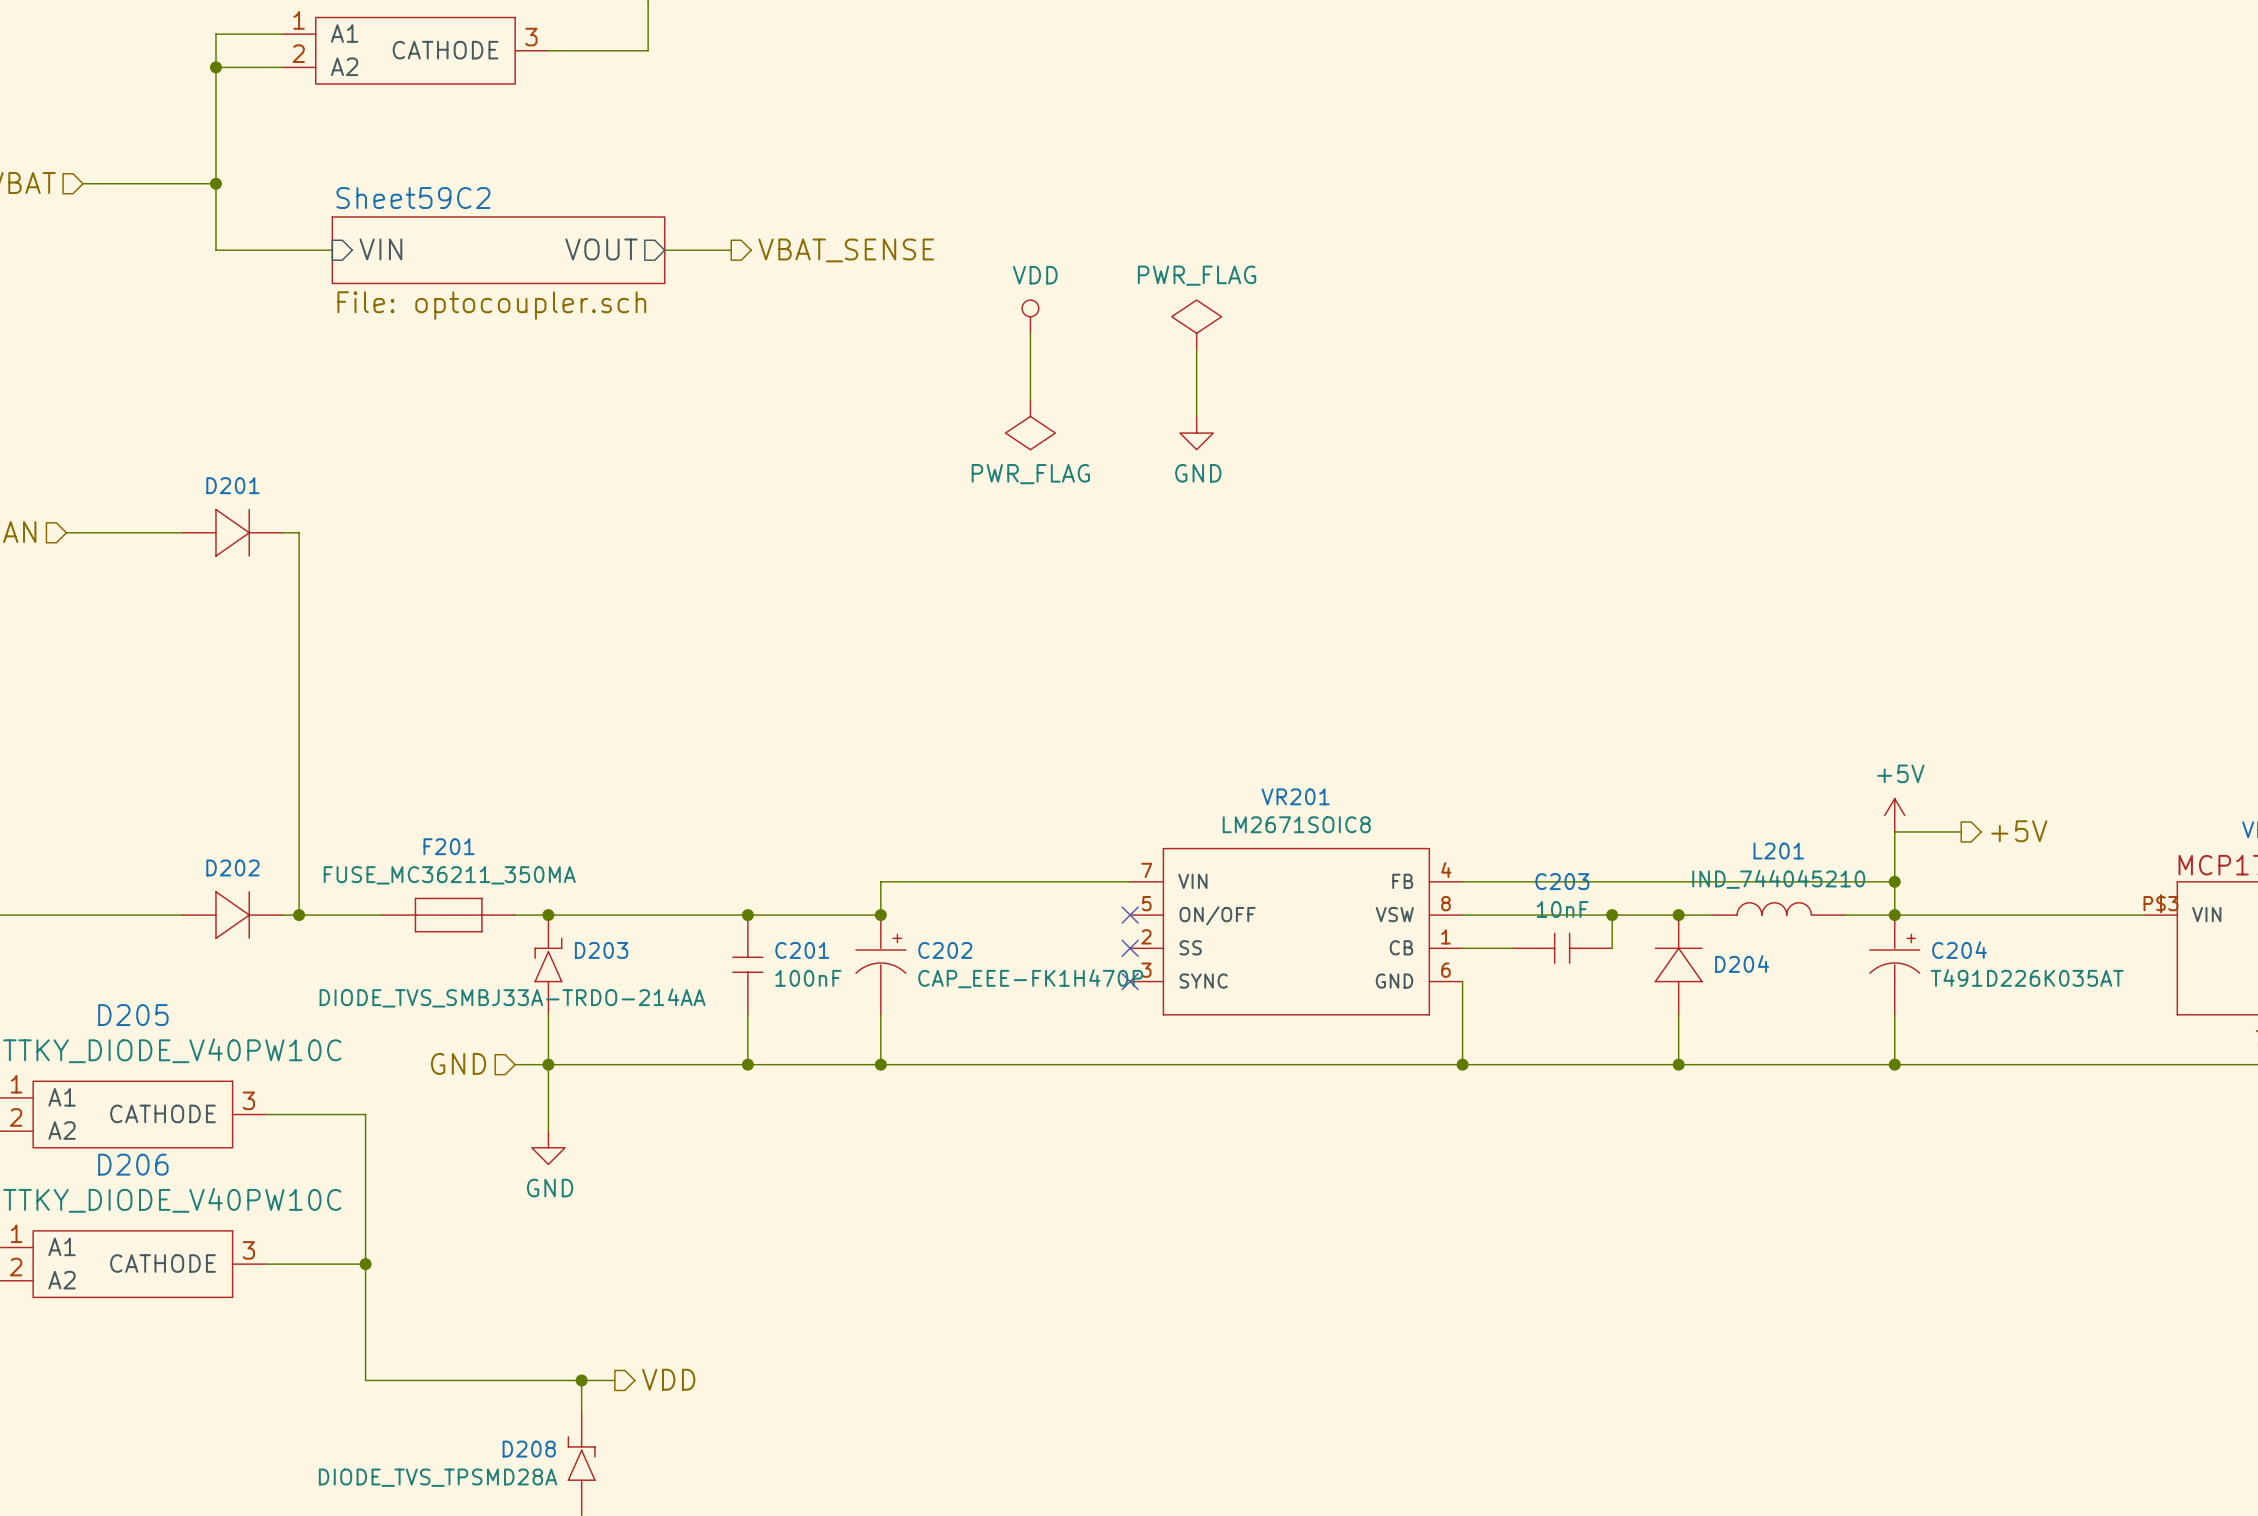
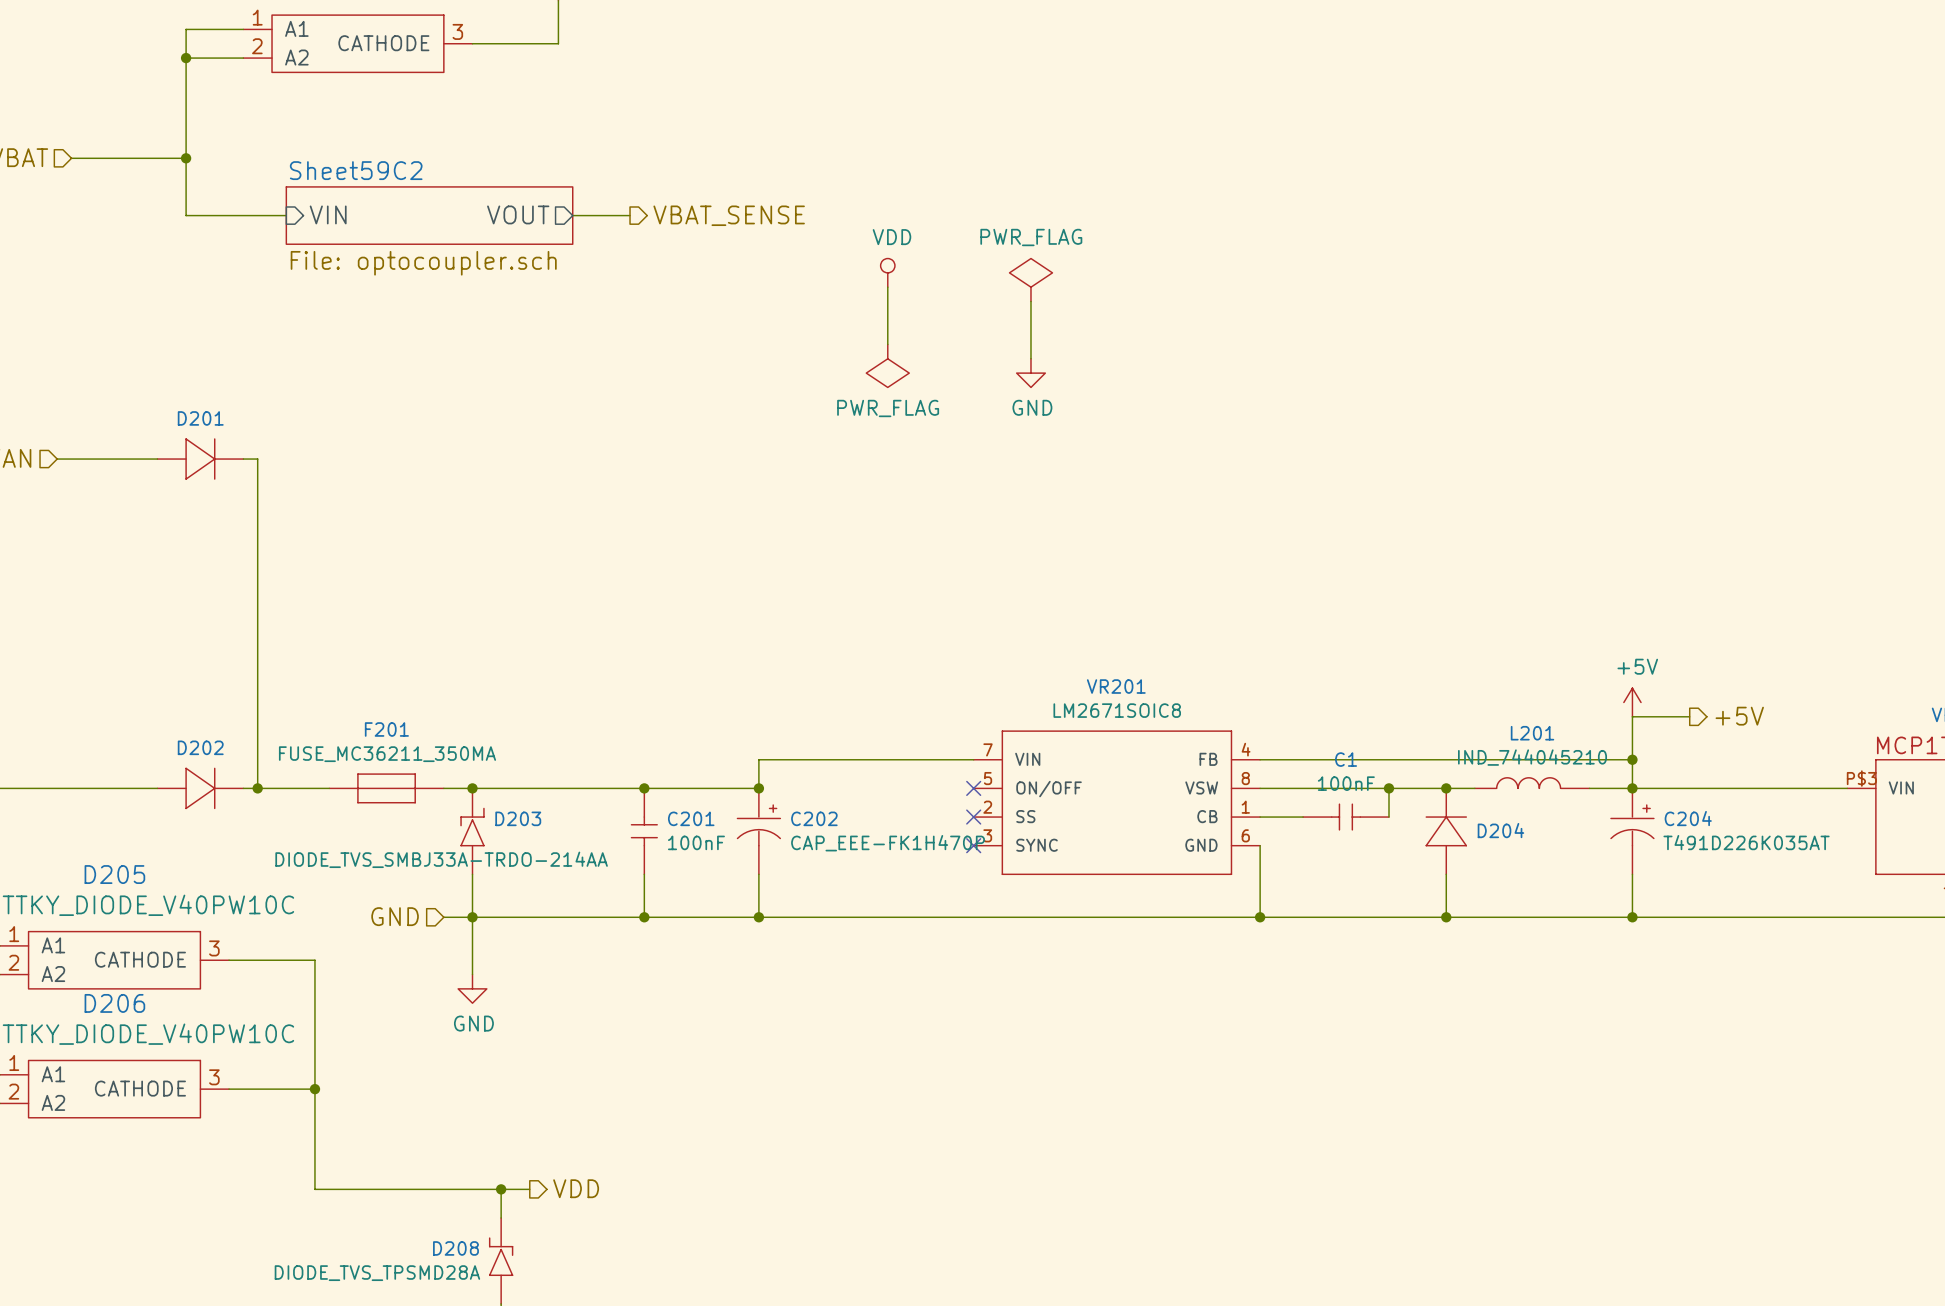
C203 name: C203 (1562, 881) -> C1 (1346, 759)
C203 value: 10nF (1562, 909) -> 100nF (1346, 783)

